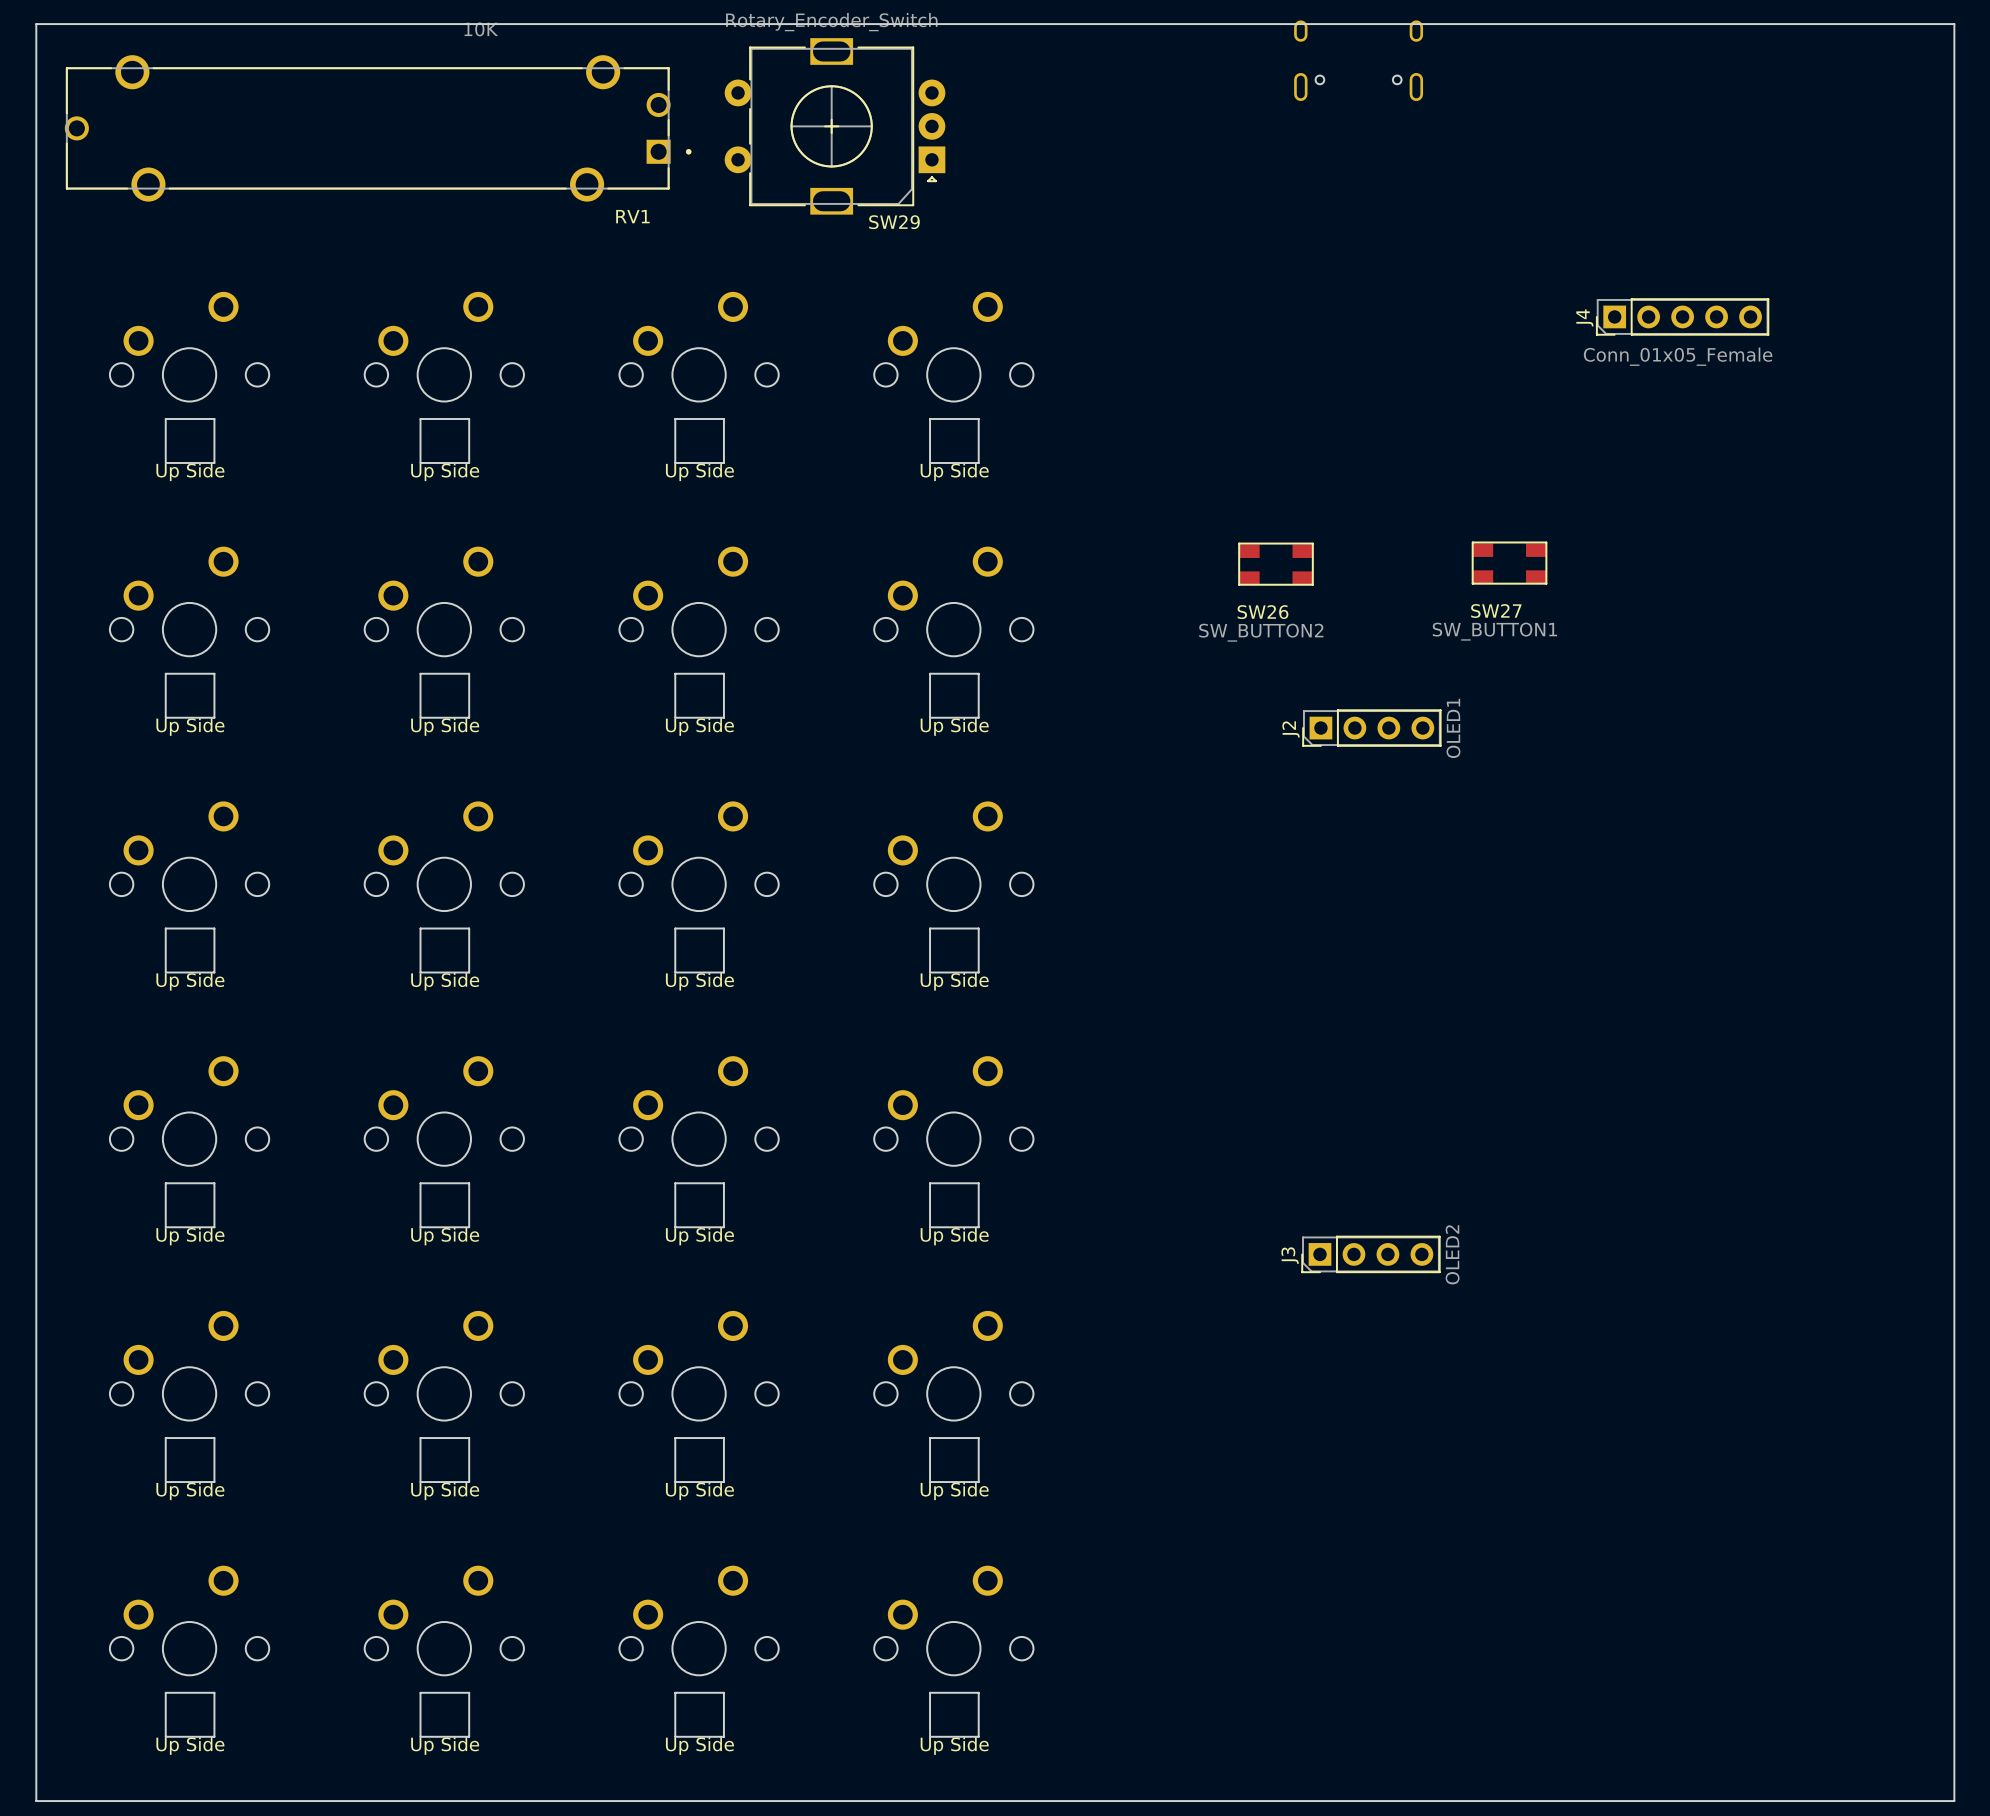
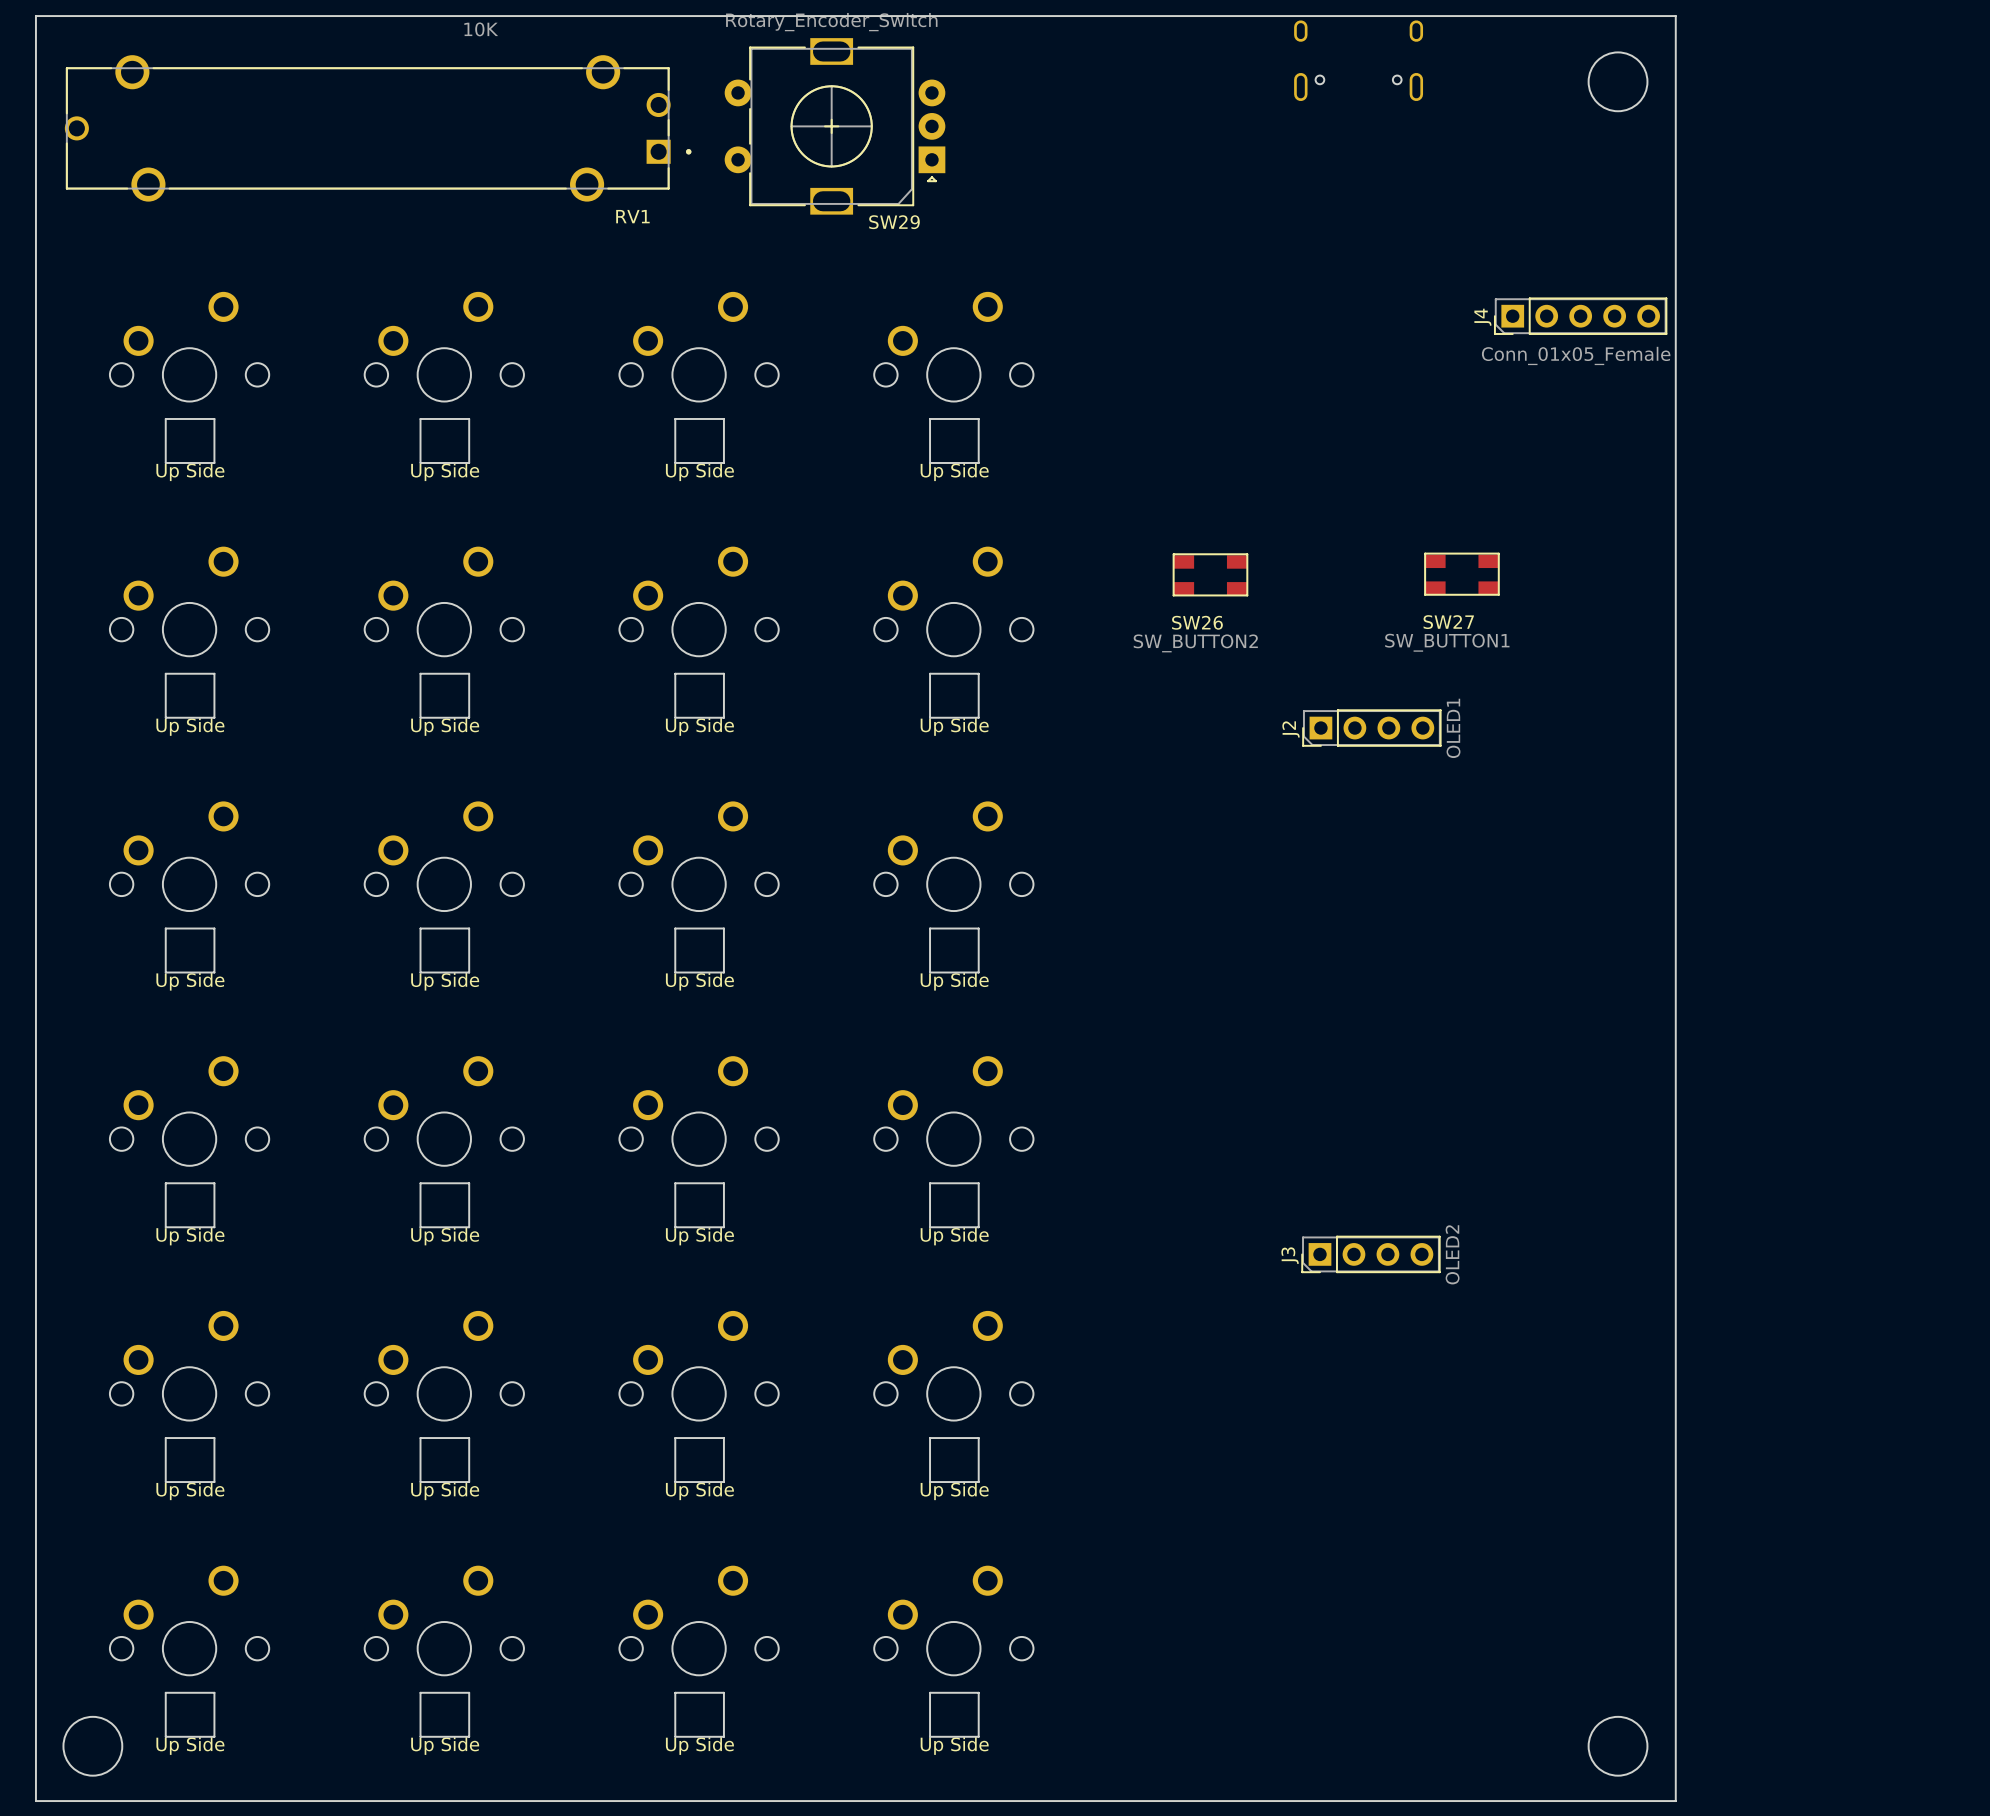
round board edge: none -> [1588, 52, 1648, 112]
J4 position: (1682, 316) -> (1580, 316)
SW27 position: (1509, 563) -> (1461, 574)
SW26 position: (1276, 564) -> (1210, 574)
round board edge: none -> [63, 1716, 123, 1777]
round board edge: none -> [1588, 1716, 1648, 1777]
board edge: (36, 1801) (36, 24) (1954, 24) (1954, 1801) (1675, 1801) -> (36, 1801) (35, 16) (1675, 16) (1675, 1801)

